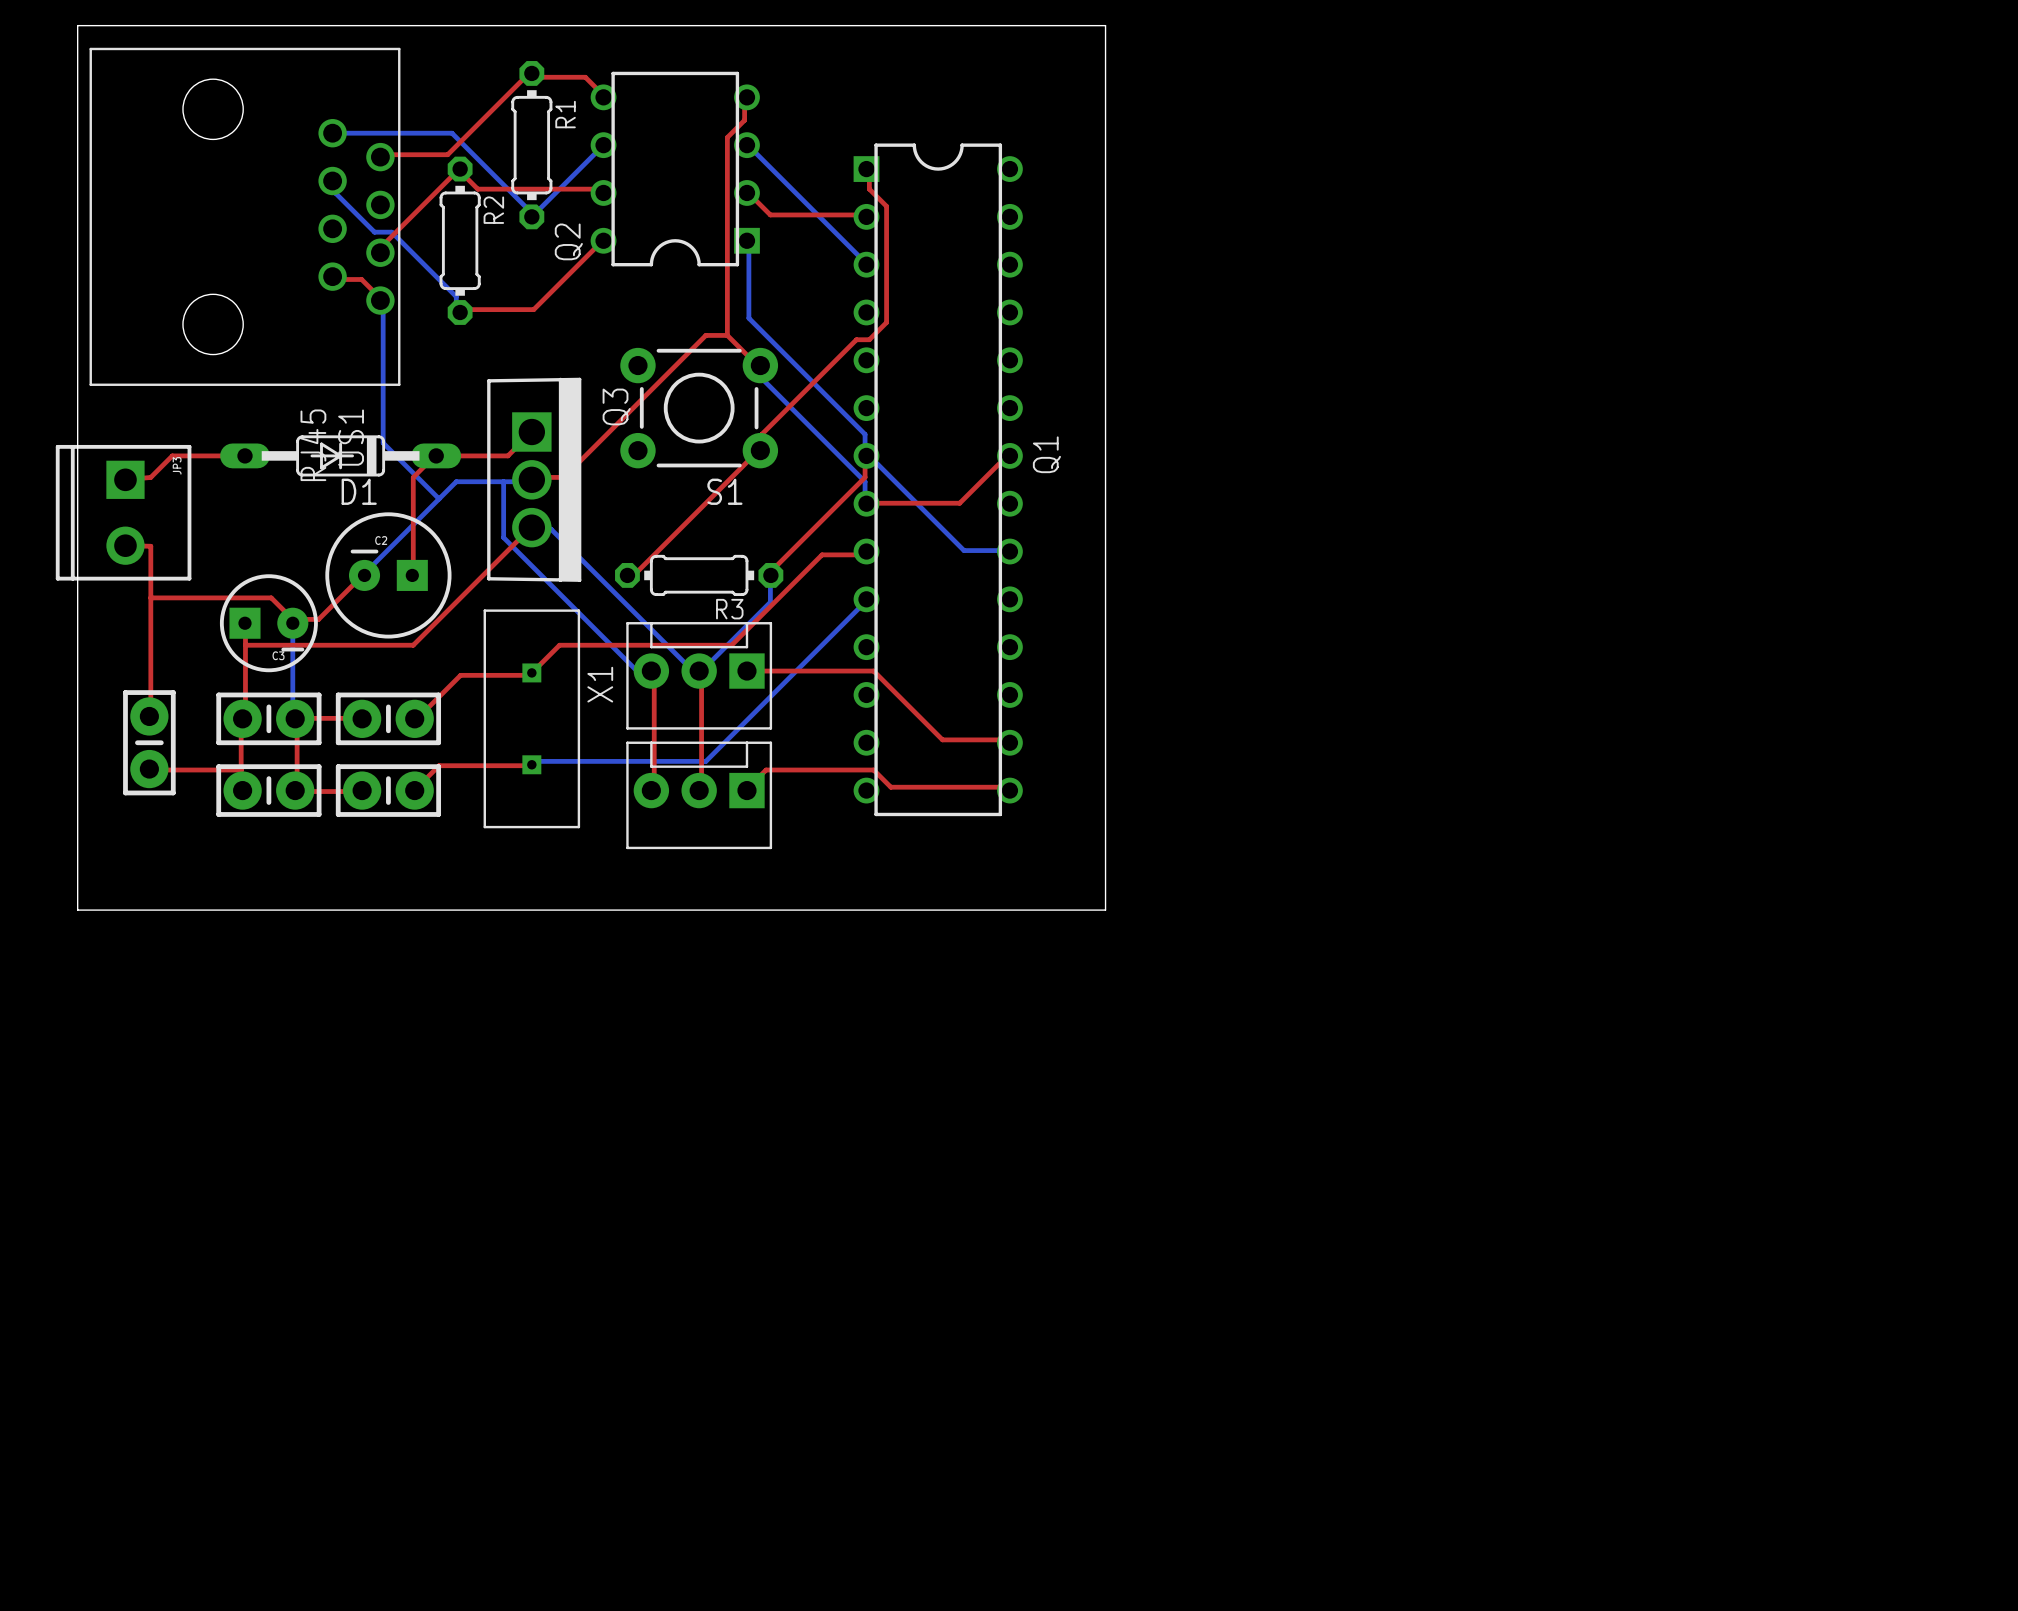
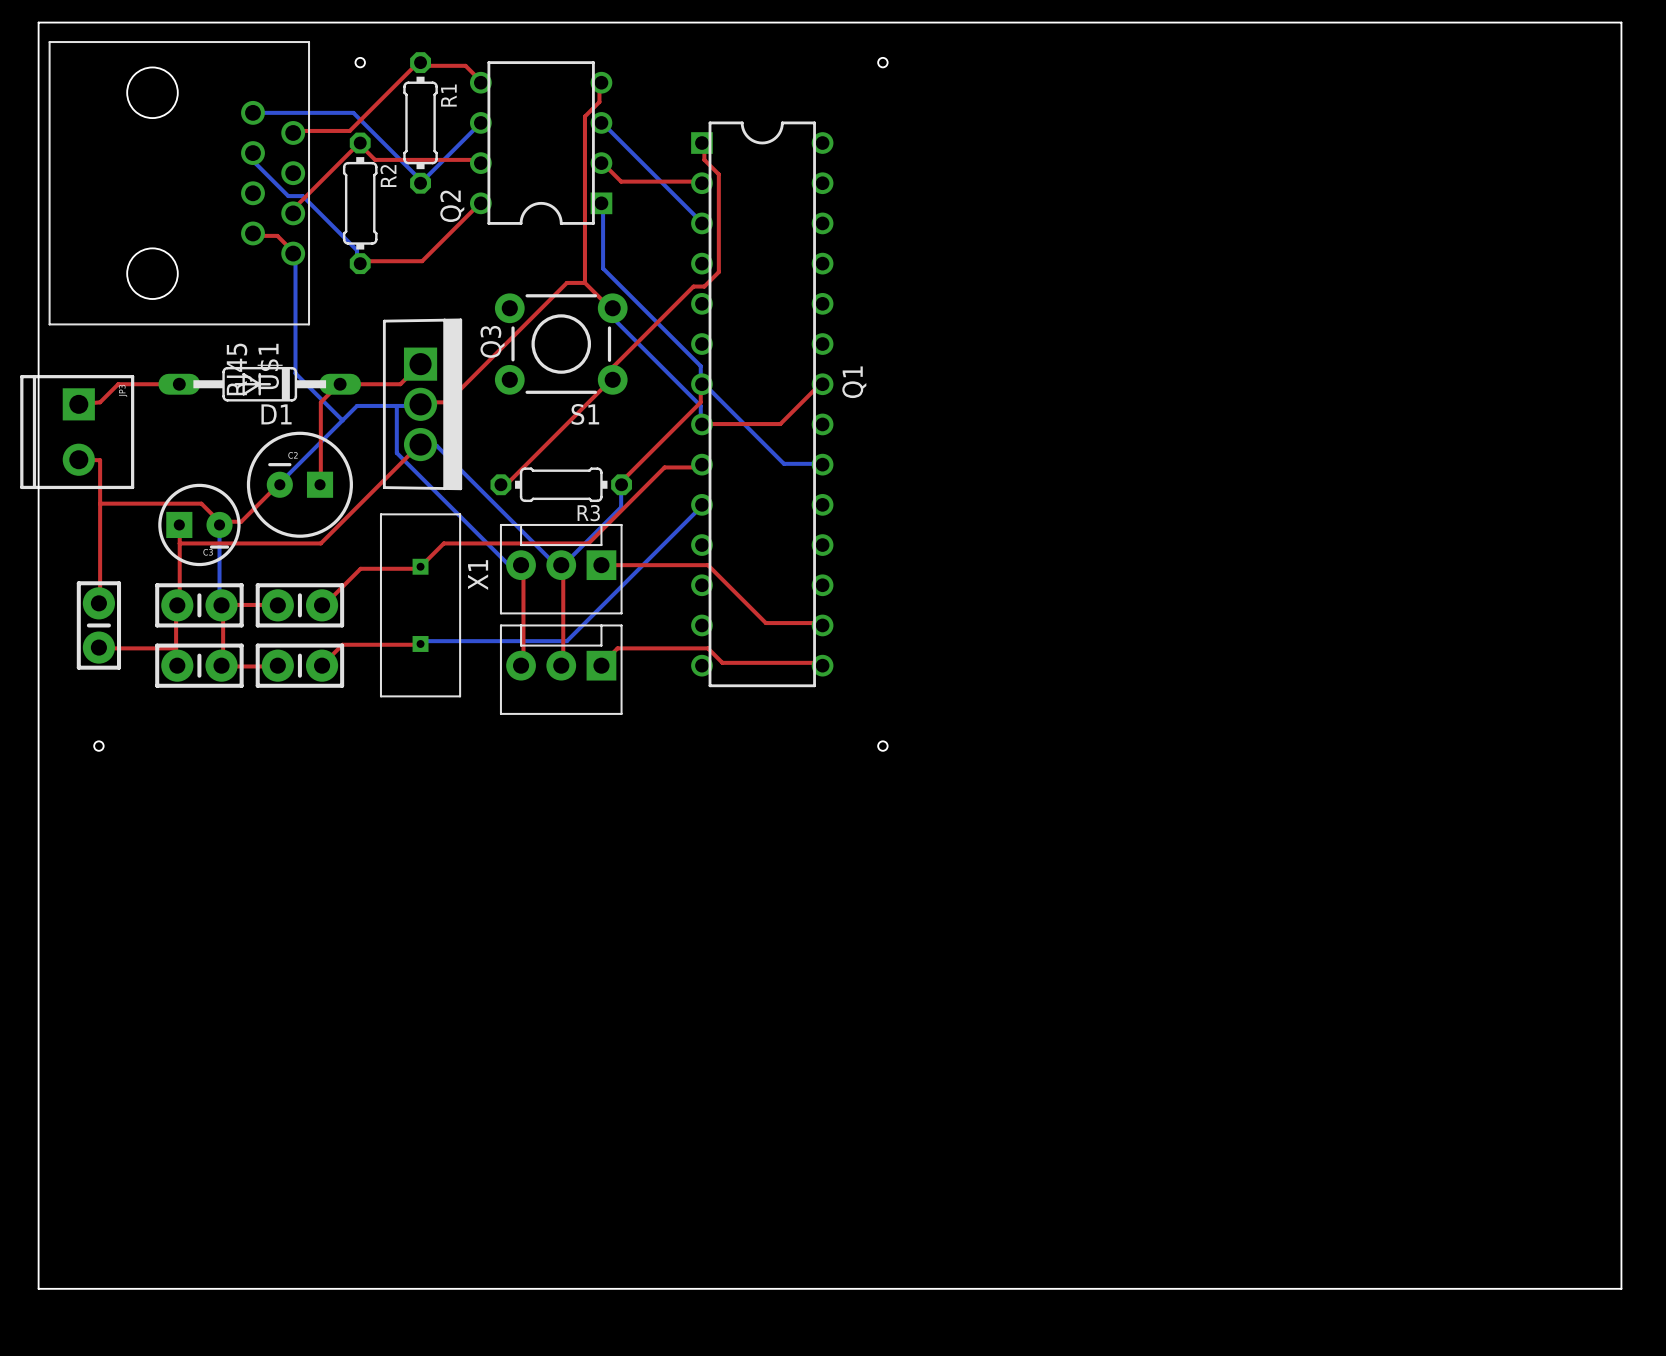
board edge: (77, 25) (1105, 25) (1105, 910) (77, 910) -> (38, 22) (1621, 22) (1621, 1288) (38, 1288) (38, 766)
hole: none -> (360, 62)
hole: none -> (882, 62)
hole: none -> (98, 746)
hole: none -> (882, 746)

